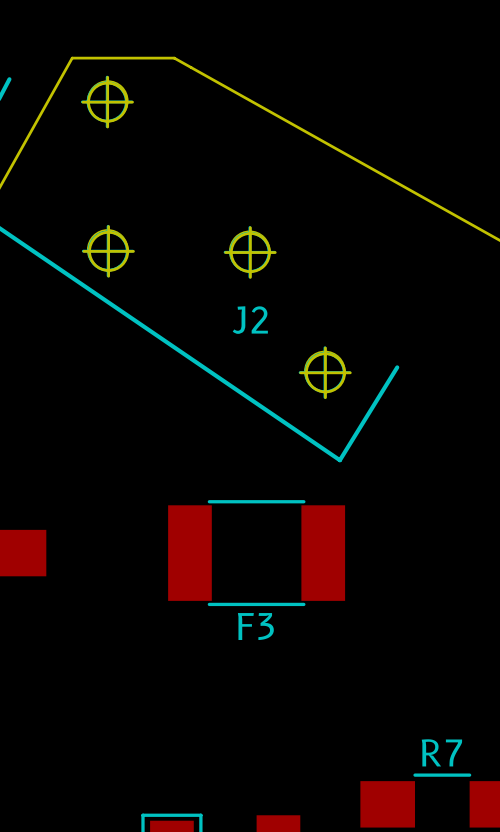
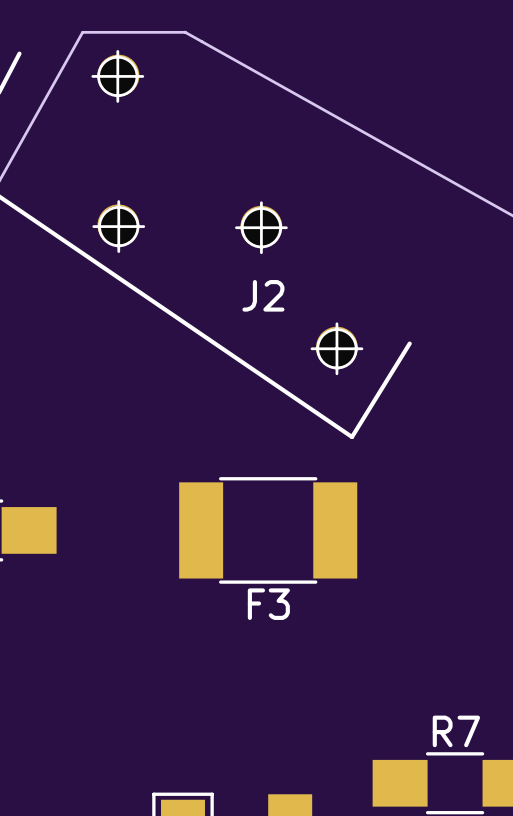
board edge: (107, 77) (107, 127) -> none
round board edge: [87, 81, 129, 123] -> none
board edge: (82, 102) (132, 102) -> none
board edge: (108, 226) (108, 276) -> none
board edge: (250, 227) (250, 277) -> none
round board edge: [88, 230, 130, 272] -> none
round board edge: [229, 232, 271, 274] -> none
board edge: (83, 251) (133, 251) -> none
board edge: (225, 252) (275, 252) -> none
board edge: (325, 347) (325, 397) -> none
round board edge: [304, 352, 346, 394] -> none
board edge: (300, 372) (350, 372) -> none

